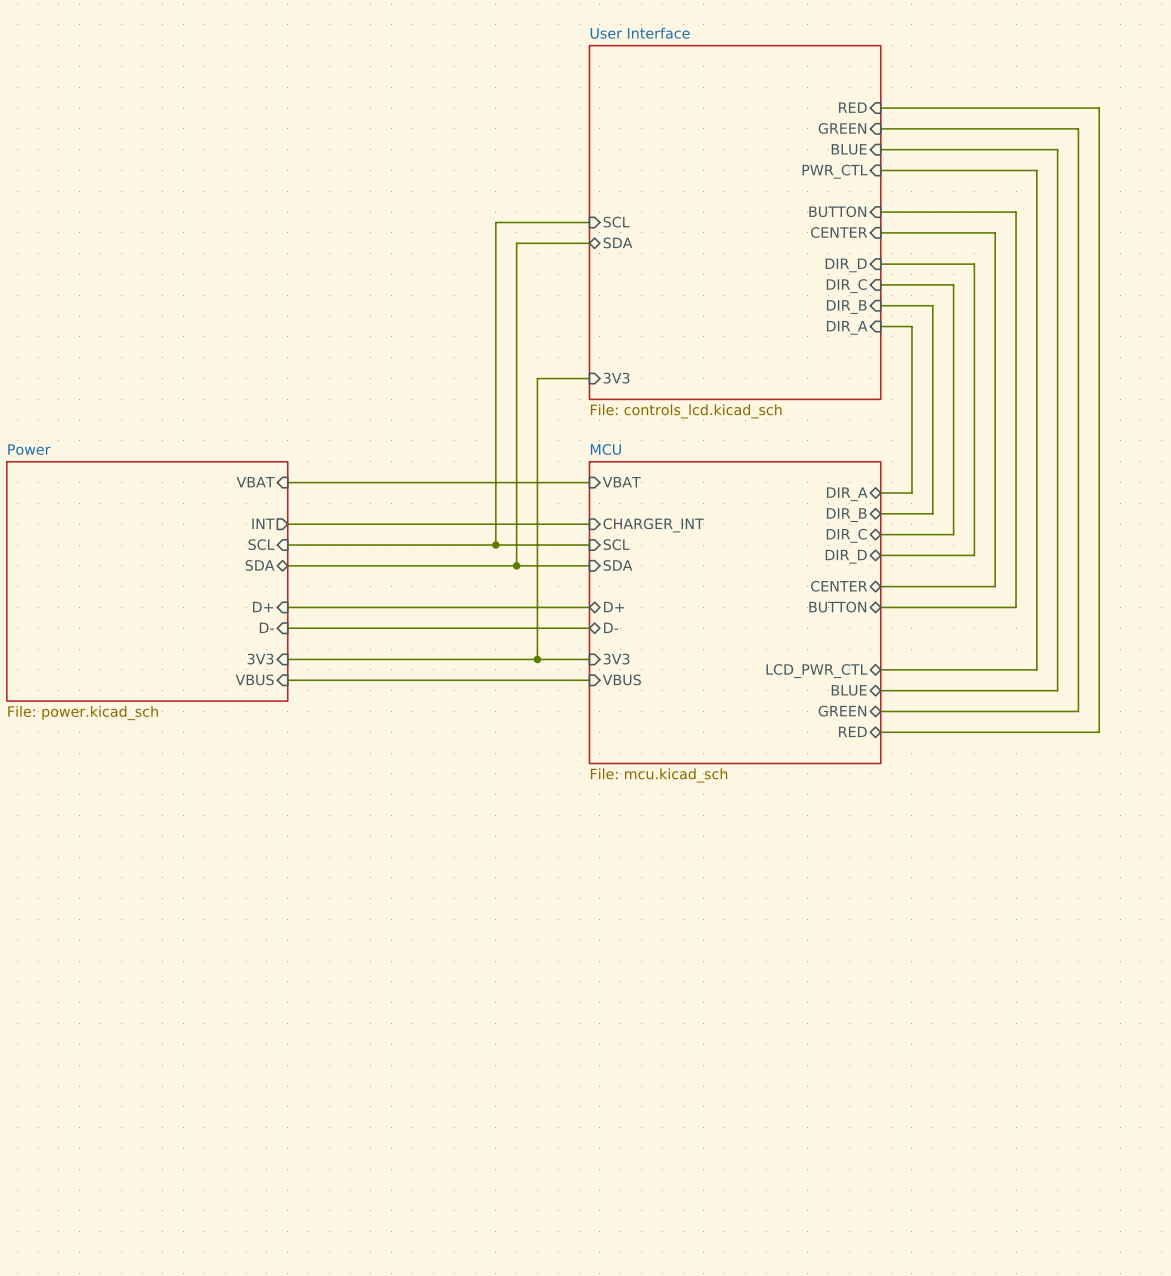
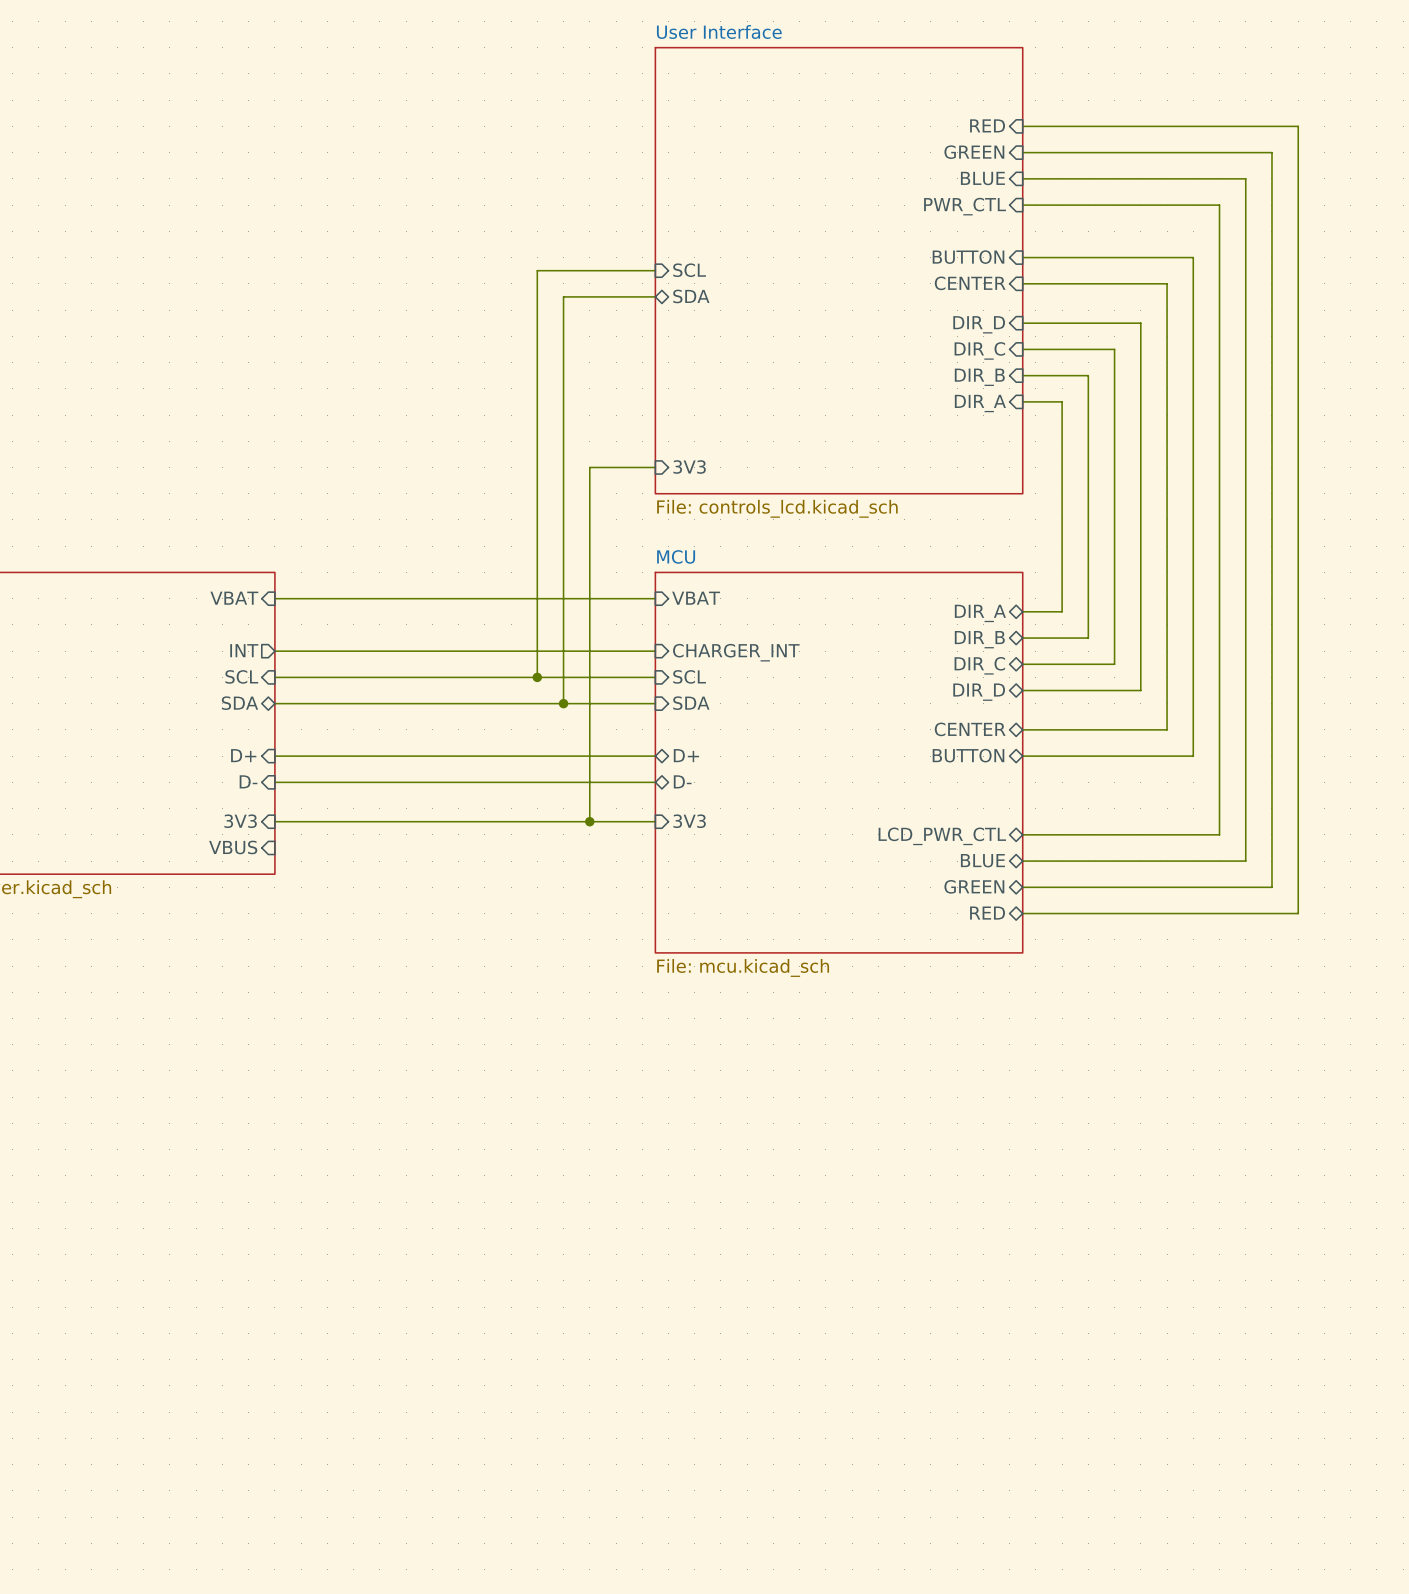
sheet pin: VBUS (621, 679) -> none
wire: (287, 680) (589, 680) -> none

